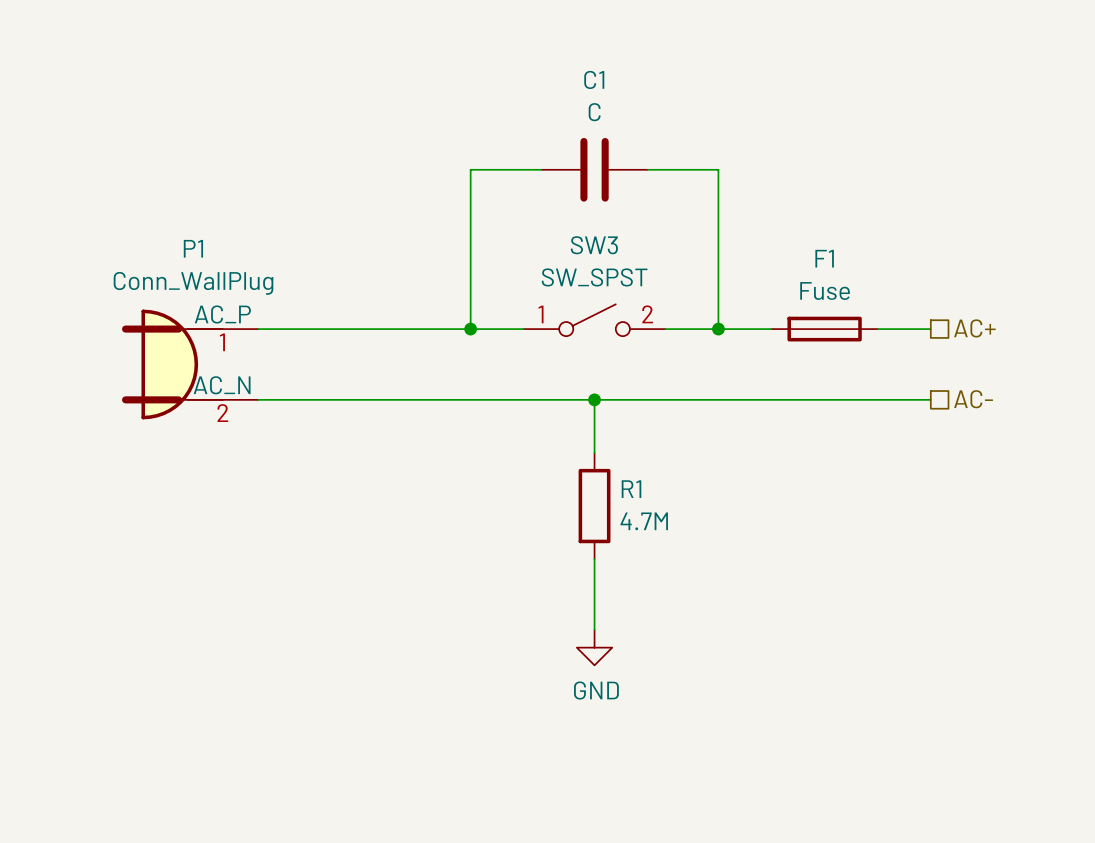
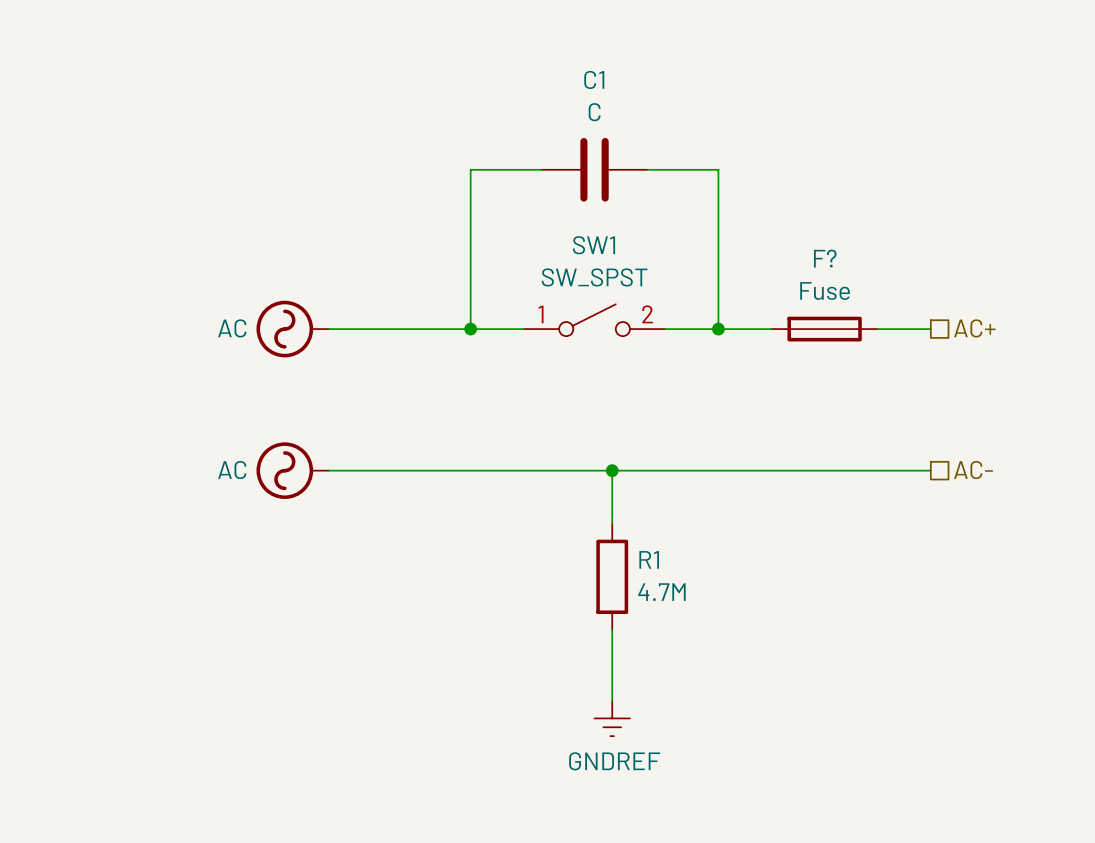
SW3 name: SW3 (594, 245) -> SW1 (594, 245)
F1 name: F1 (824, 258) -> F? (825, 258)
wire: (258, 329) (329, 329) -> none
power symbol: none -> AC (292, 329)
P1: Conn_WallPlug (190, 364) -> none
wire: (258, 399) (930, 399) -> none
wire: (594, 399) (594, 452) -> (612, 470) (612, 523)
junction position: (594, 399) -> (612, 470)
hierarchical label position: AC- (973, 399) -> AC- (973, 470)
power symbol: none -> AC (292, 470)
wire: none -> (329, 470) (930, 470)
R1 position: (594, 506) -> (612, 576)
wire: (594, 559) (594, 629) -> (612, 629) (612, 700)
power symbol: GND (594, 647) -> none
power symbol: none -> GNDREF (612, 718)

